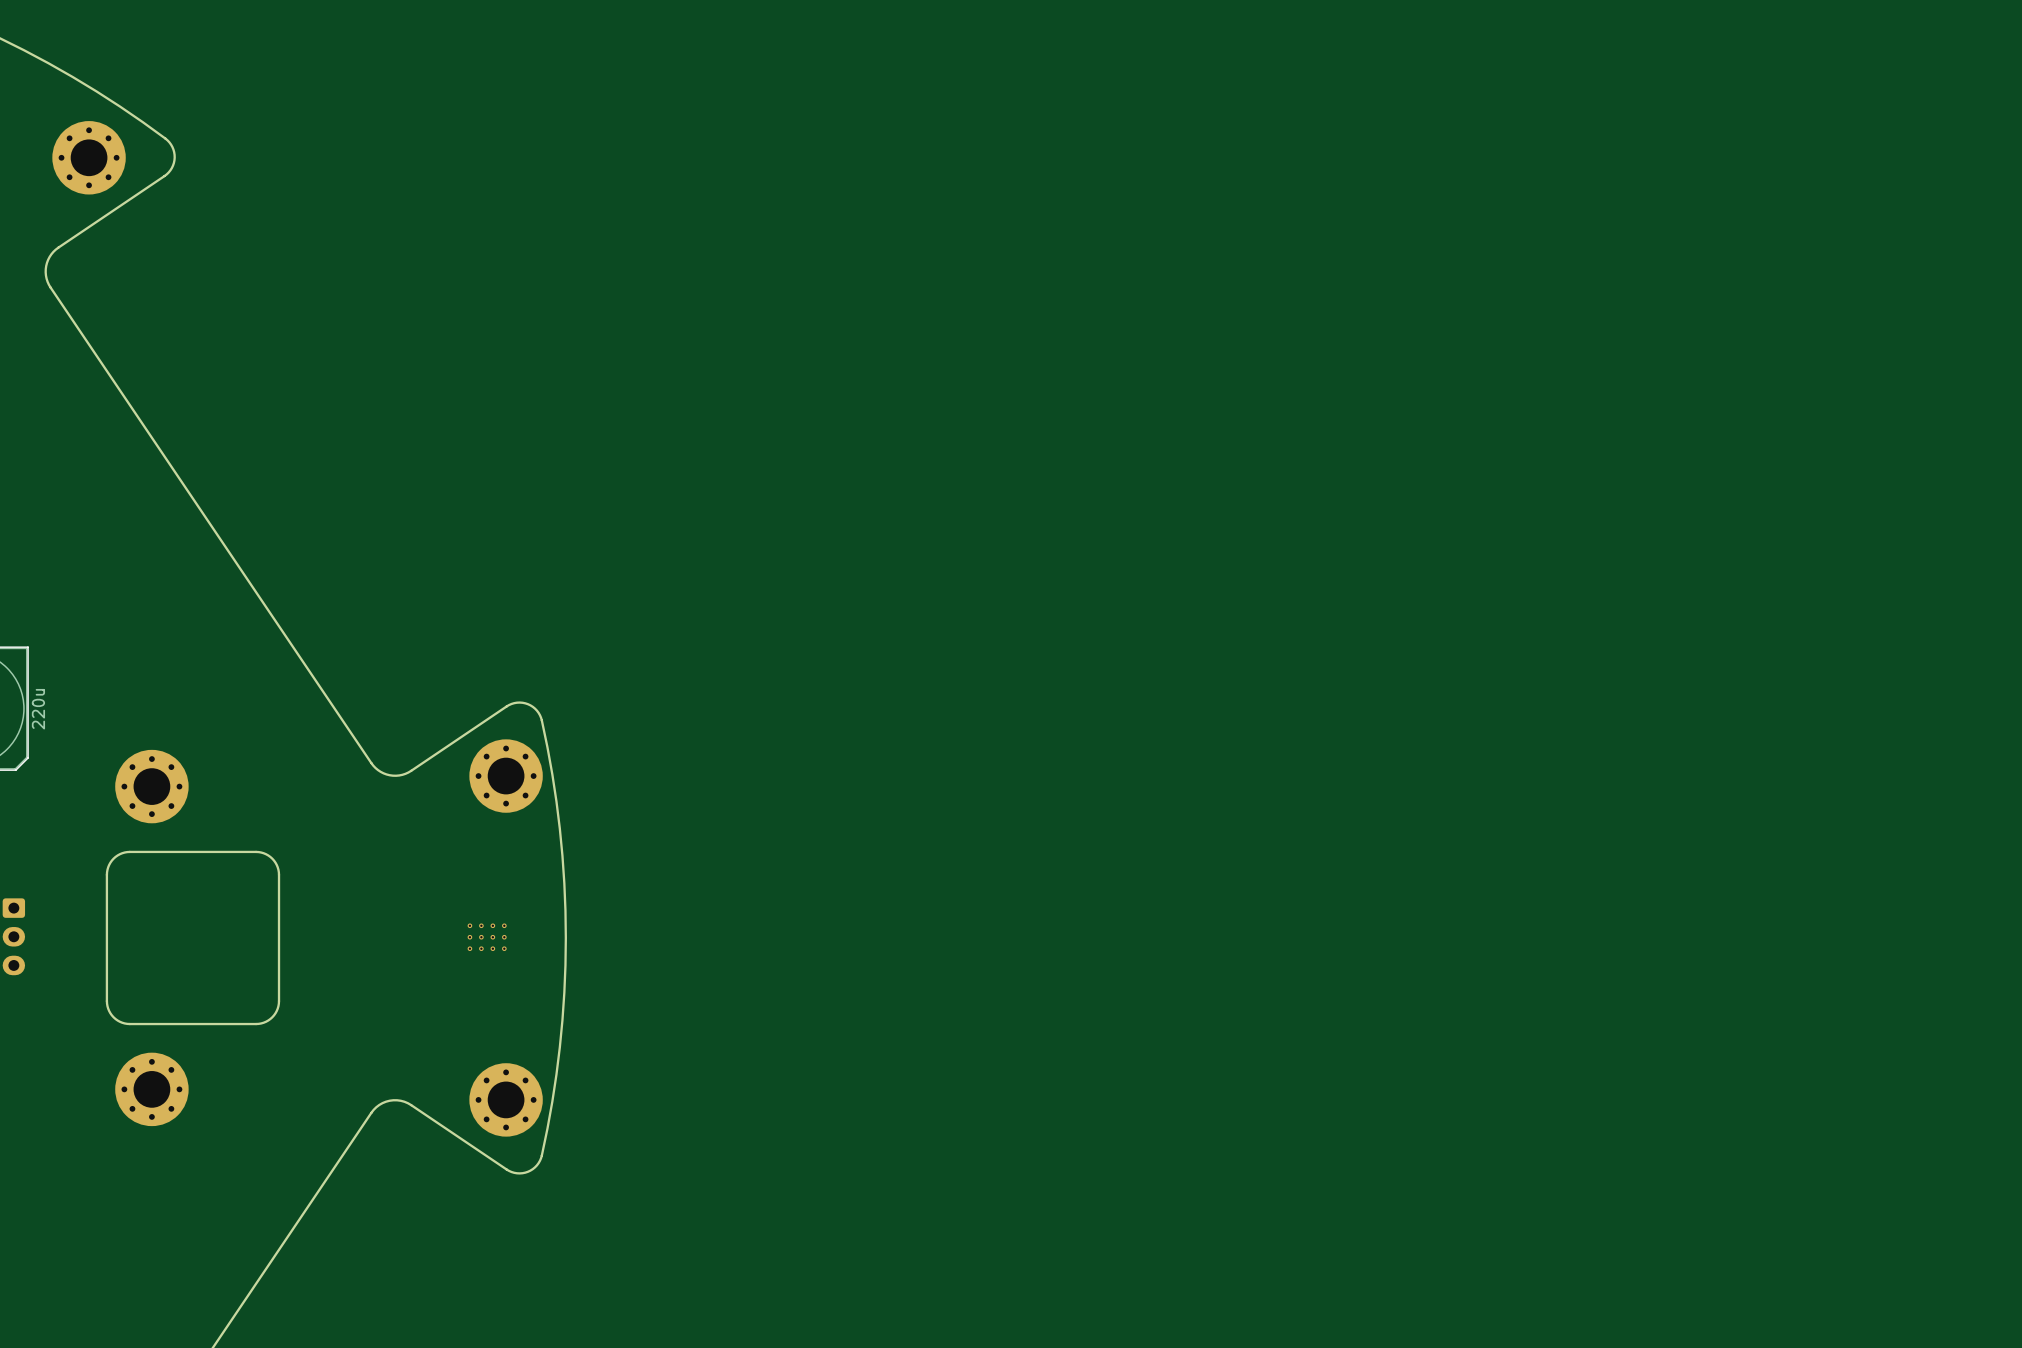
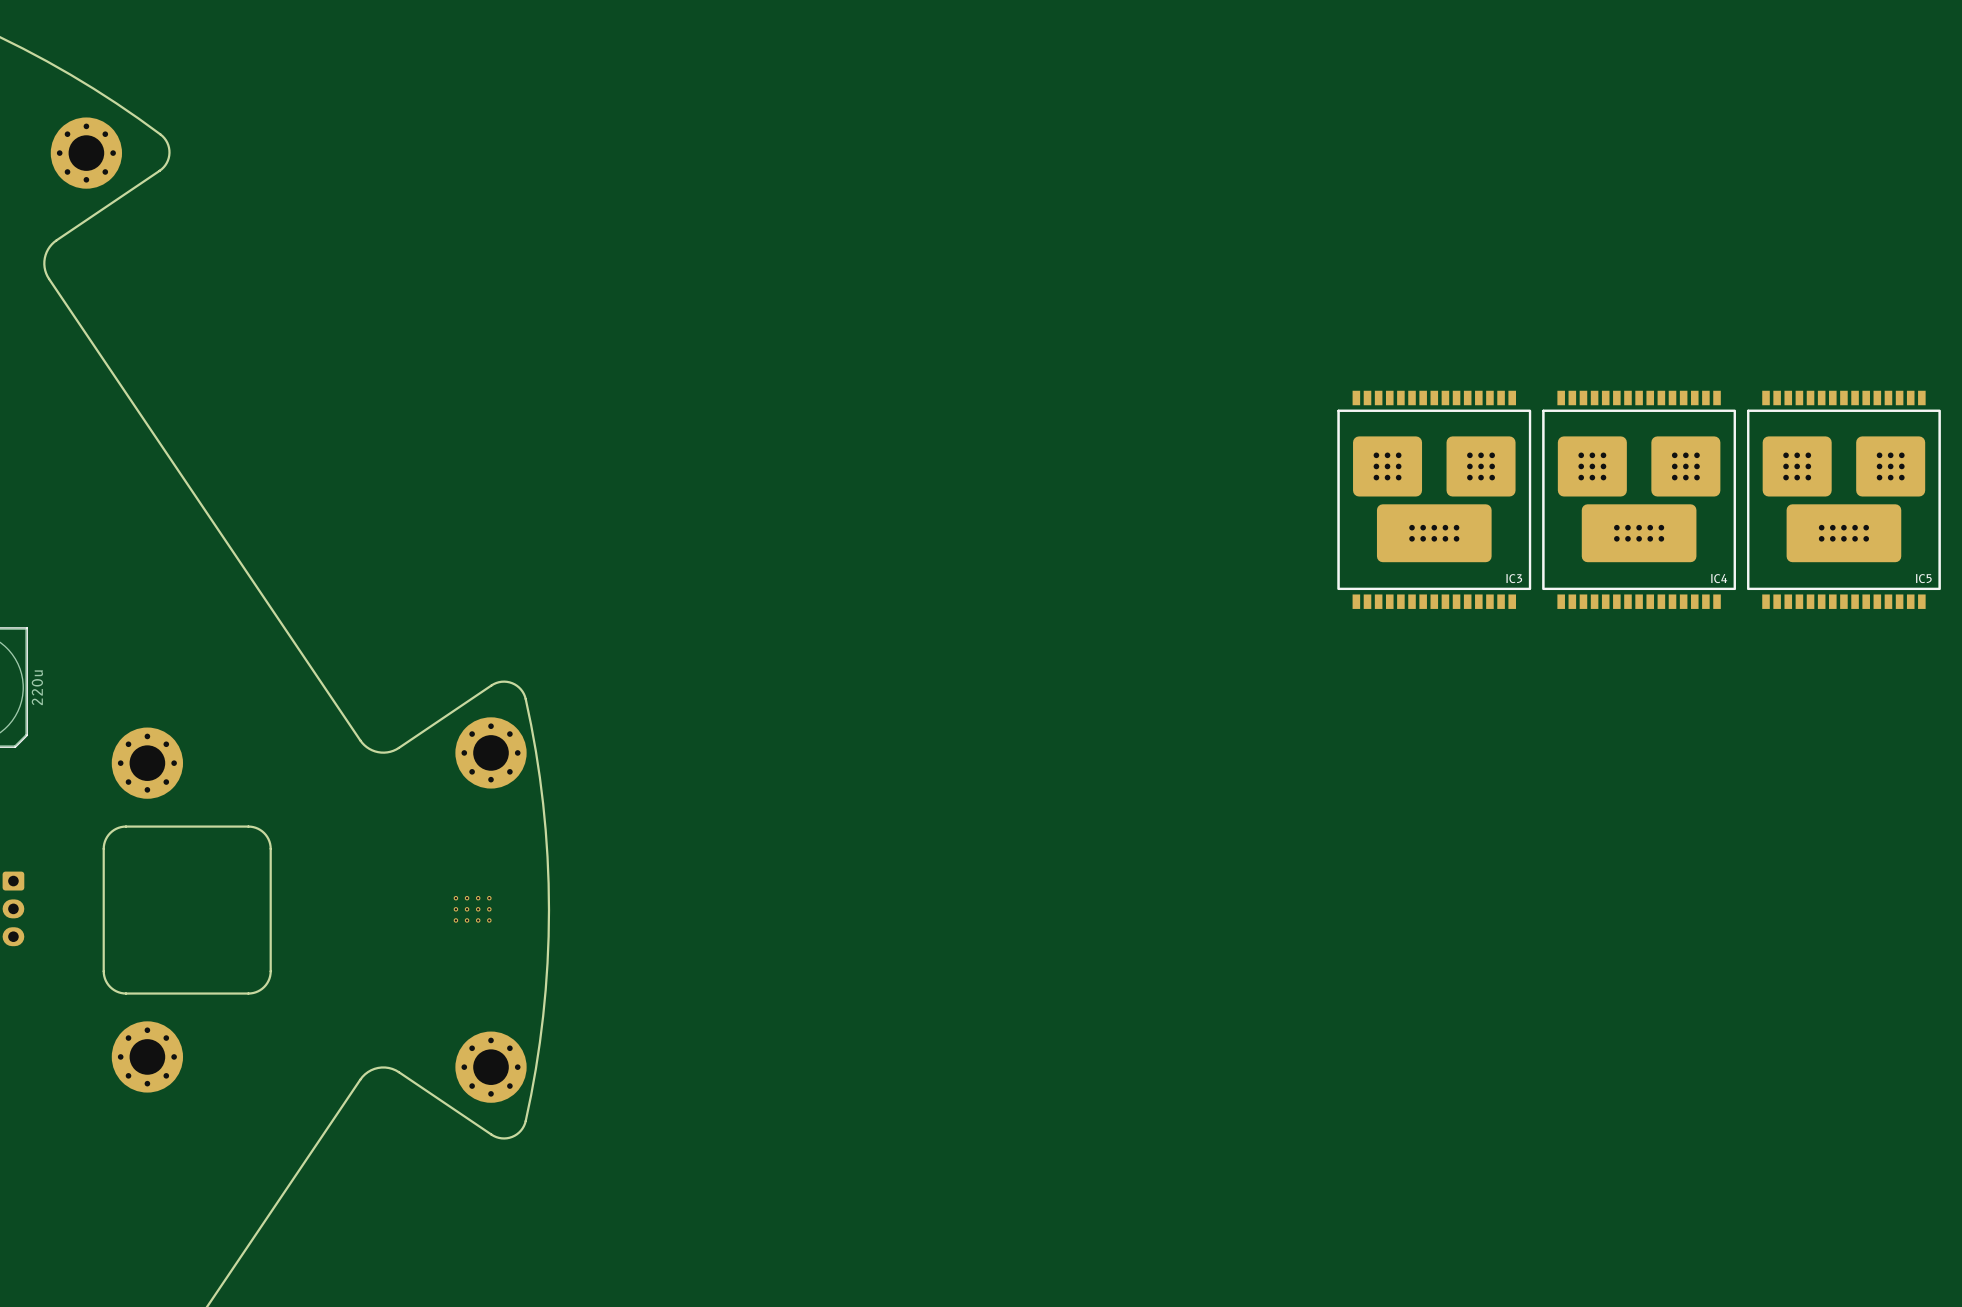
IC3: none -> (1434, 499)
IC4: none -> (1639, 499)
IC5: none -> (1843, 499)

